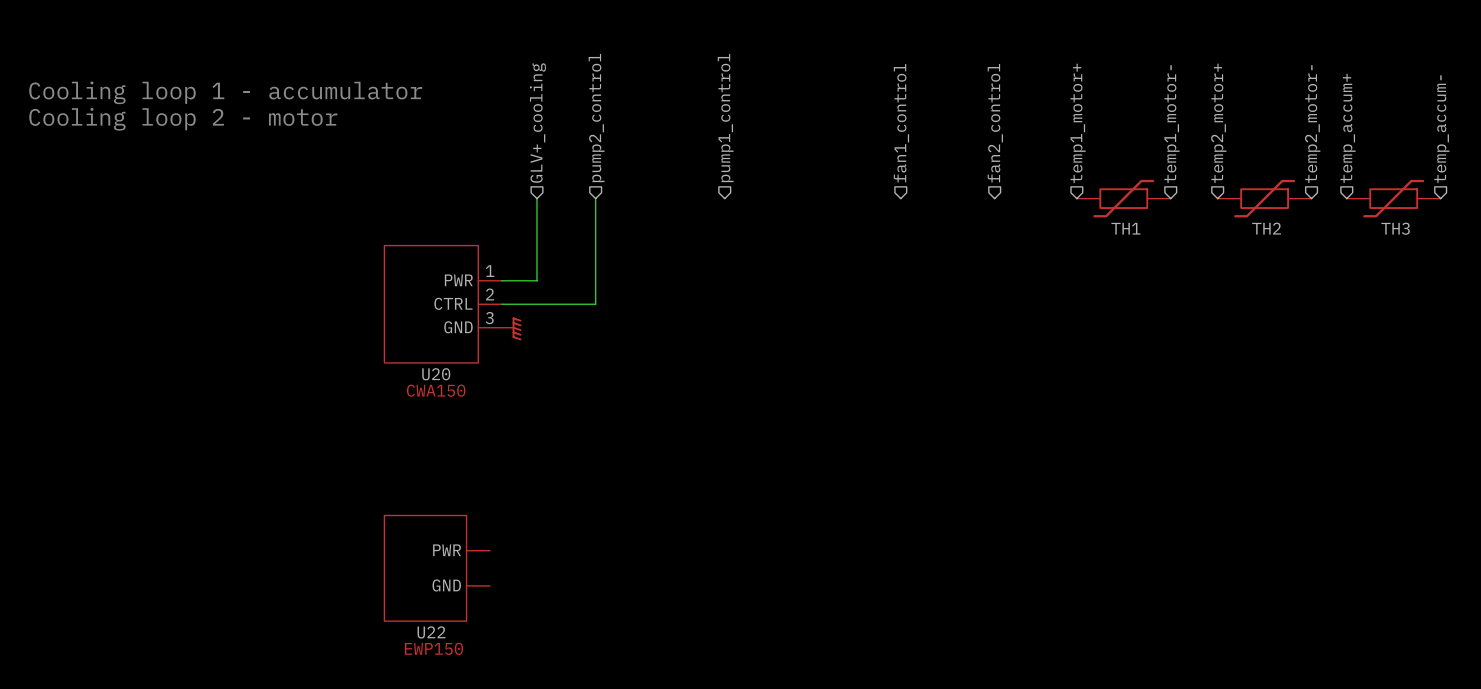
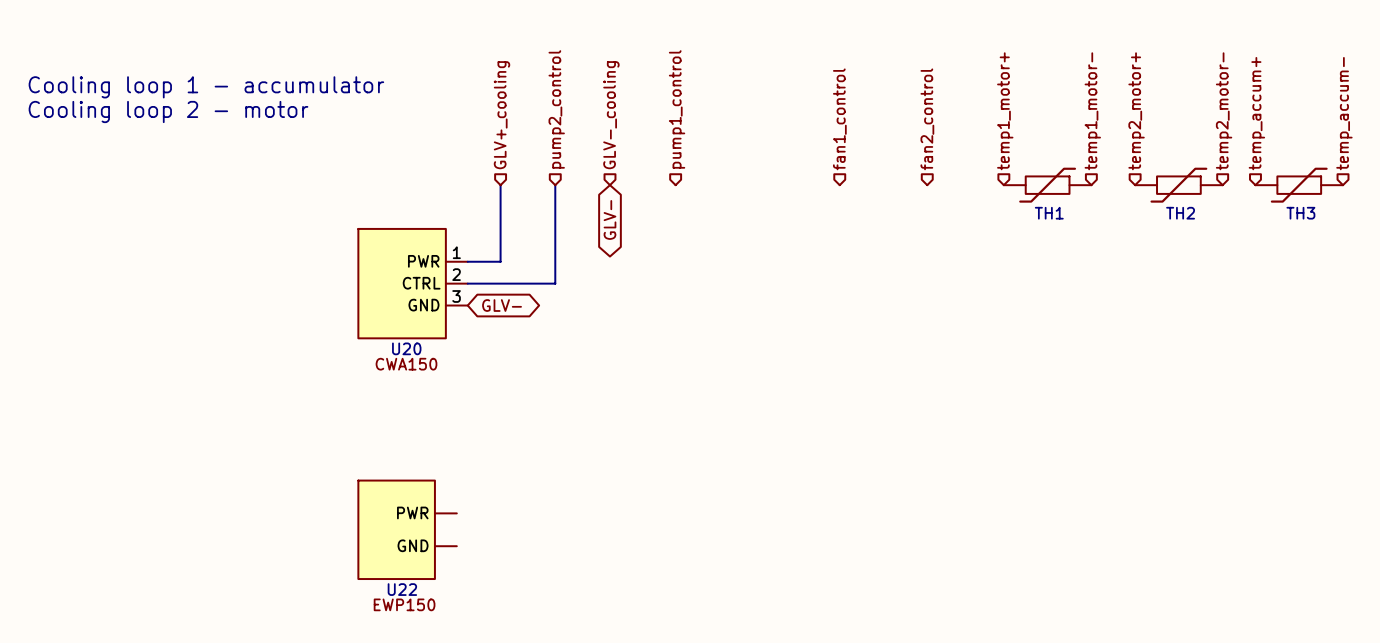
hierarchical label: none -> GLV-_cooling (611, 115)
global label: none -> GLV- (609, 219)
global label: none -> GLV- (502, 305)
power symbol: (511, 328) -> none

